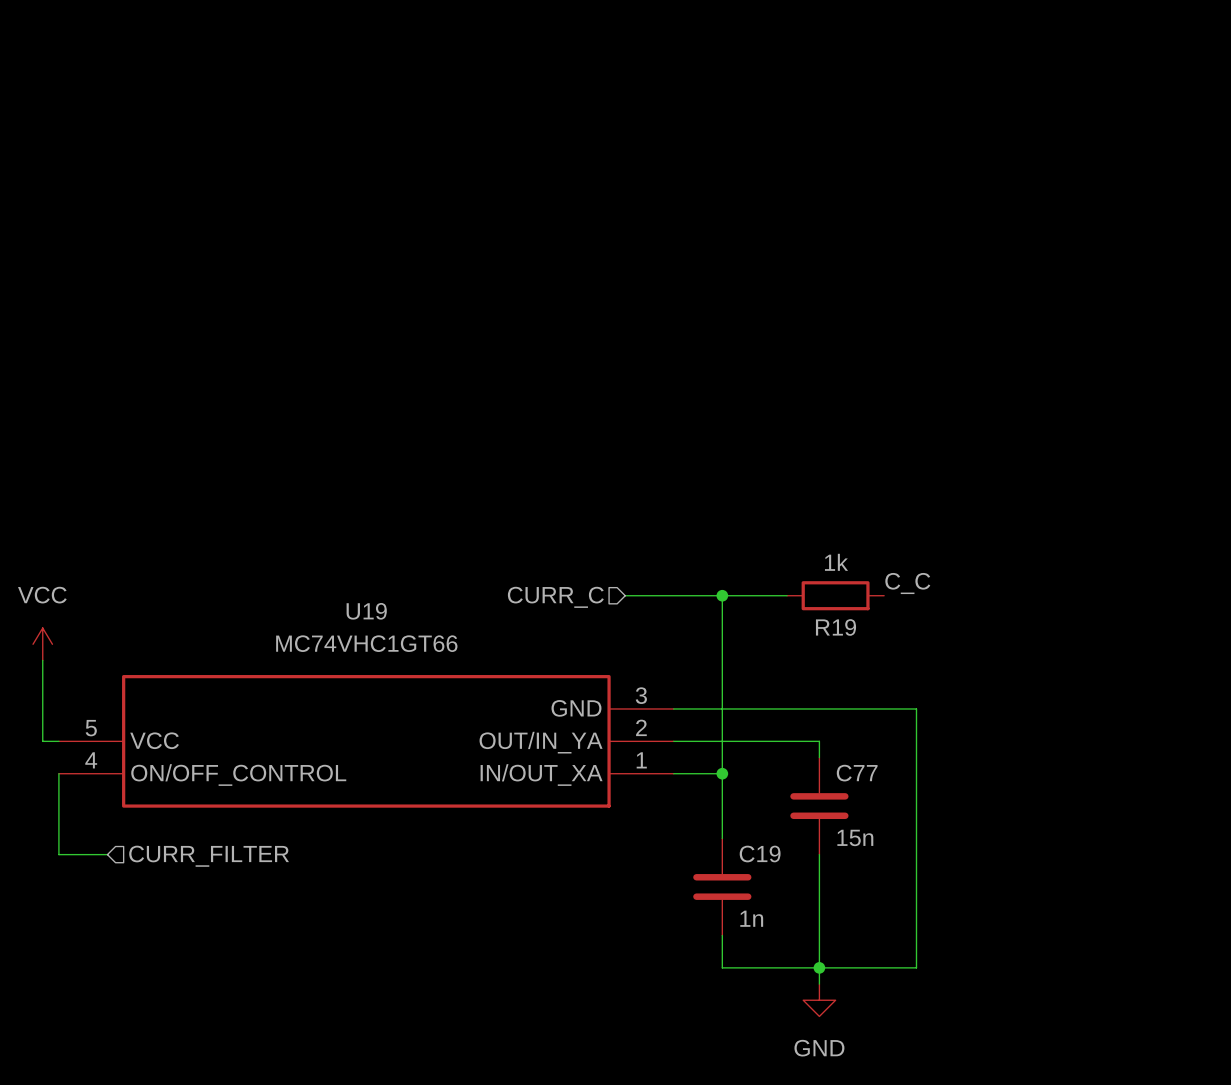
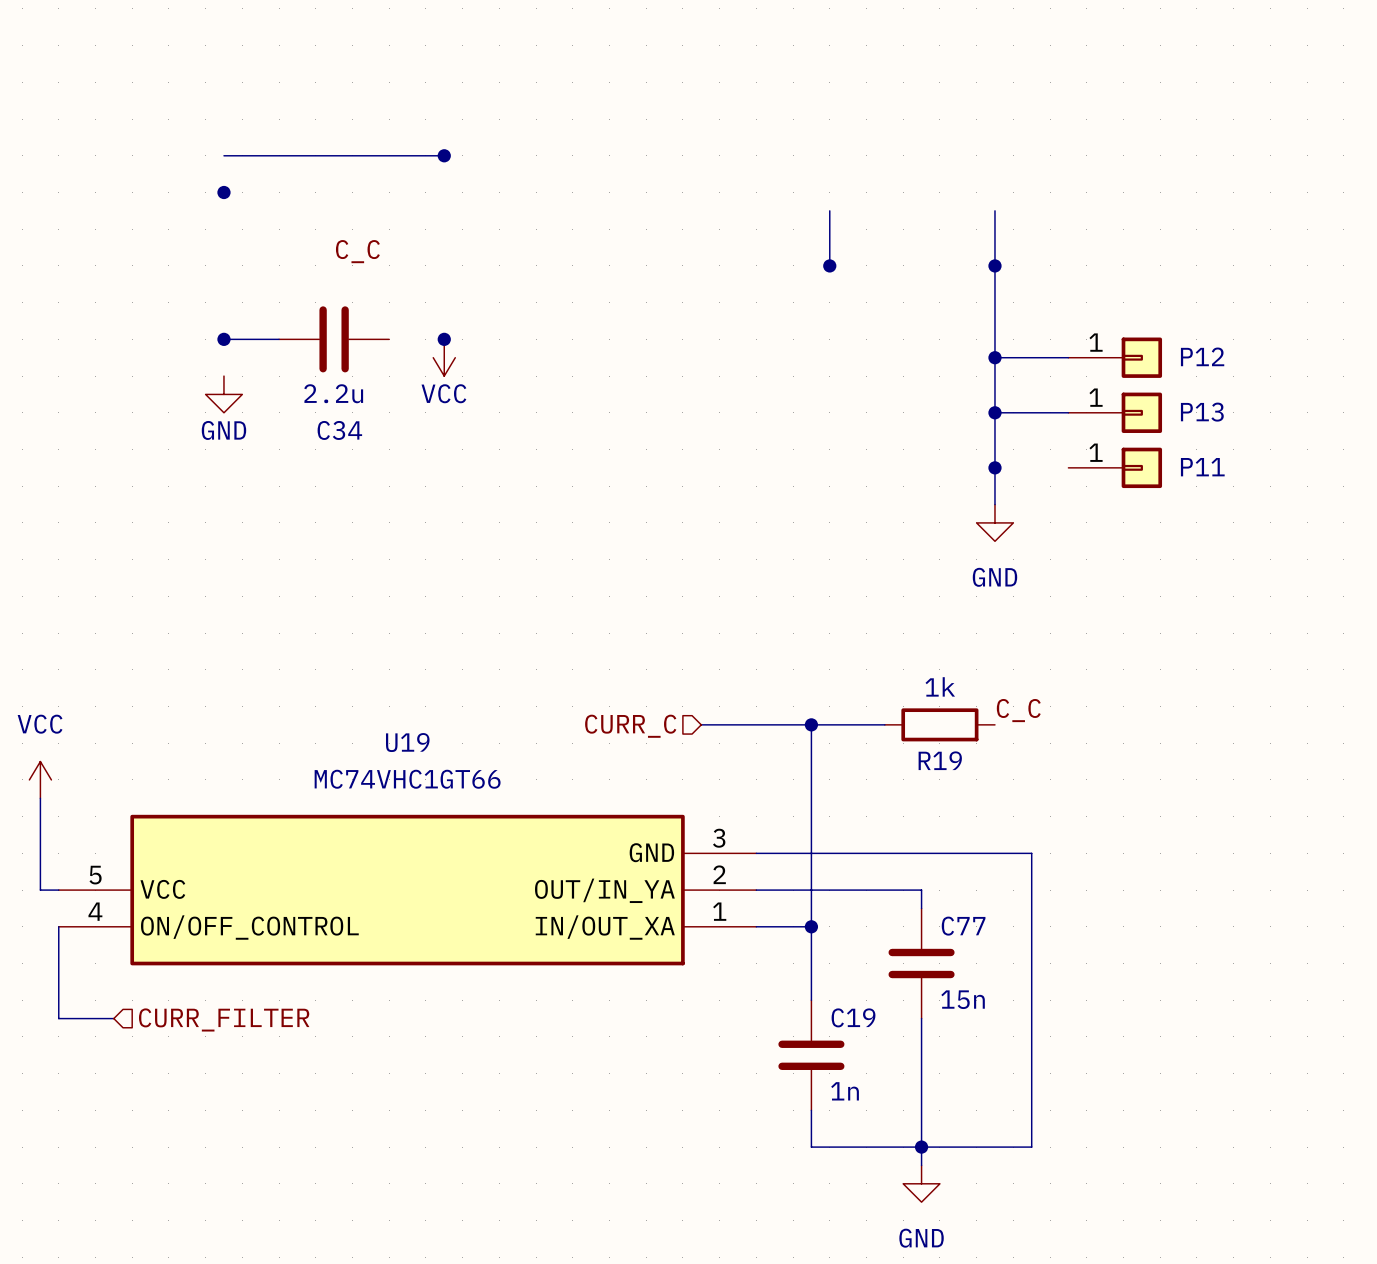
wire: none -> (223, 155) (444, 155)
junction: none -> (444, 155)
junction: none -> (223, 192)
wire: none -> (829, 210) (829, 265)
wire: none -> (994, 210) (994, 504)
label: none -> C_C (357, 251)
junction: none -> (829, 265)
junction: none -> (994, 265)
wire: none -> (223, 339) (279, 339)
junction: none -> (223, 339)
C34: none -> 2.2u (334, 339)
junction: none -> (444, 339)
power symbol: none -> VCC (444, 357)
wire: none -> (994, 357) (1068, 357)
junction: none -> (994, 357)
P12: none -> (1115, 357)
power symbol: none -> GND (223, 394)
wire: none -> (994, 412) (1068, 412)
junction: none -> (994, 412)
P13: none -> (1115, 412)
junction: none -> (994, 467)
P11: none -> (1115, 467)
power symbol: none -> GND (994, 522)

